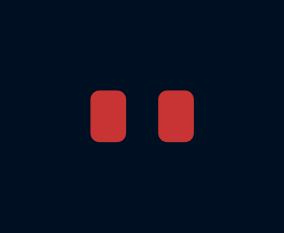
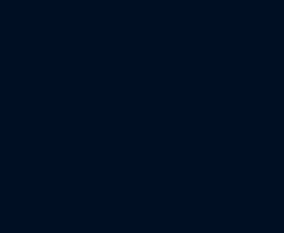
part: (142, 116) -> none

